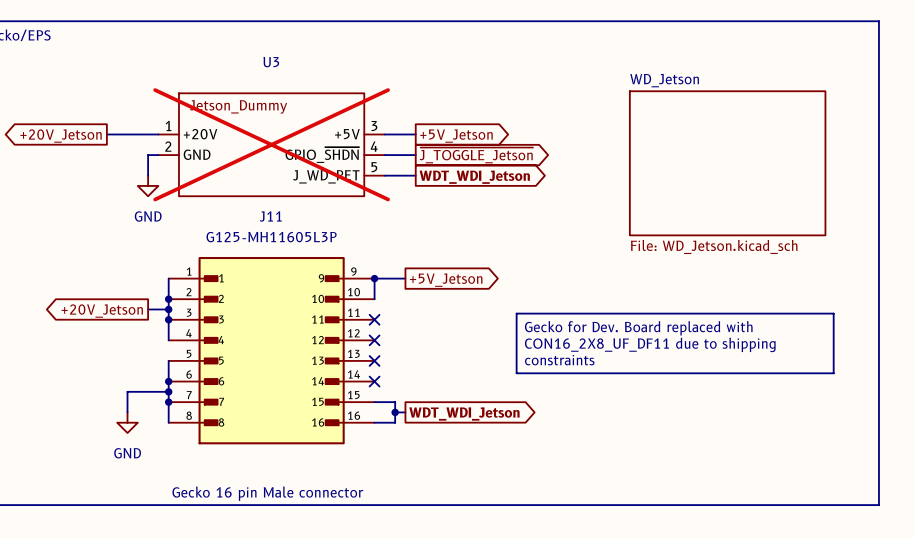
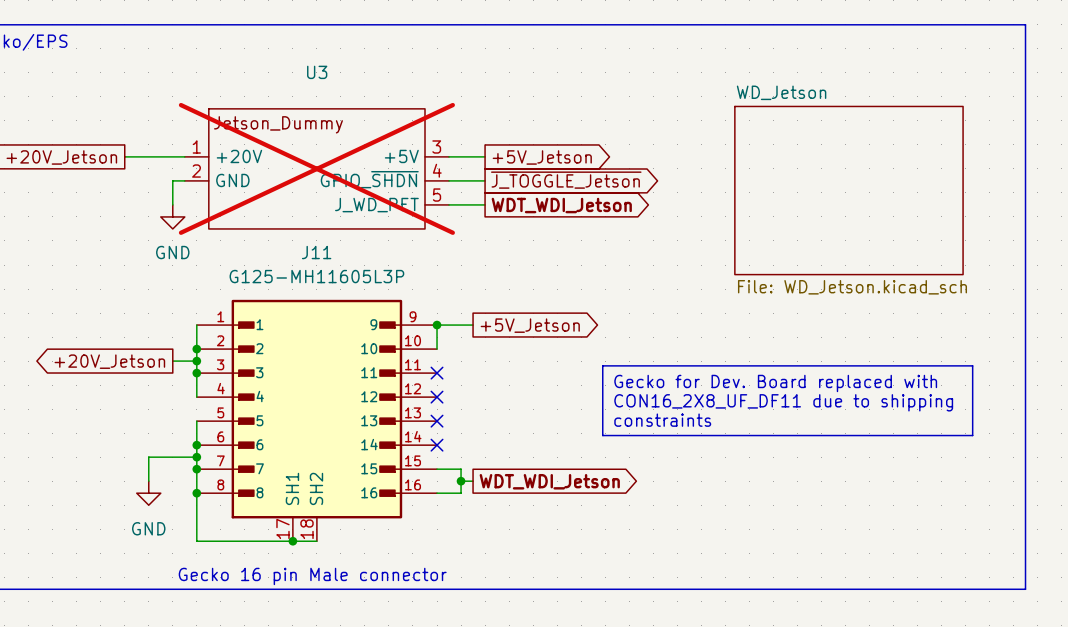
J11 symbol: [168, 256, 375, 445] -> [196, 299, 438, 542]
wire: none -> (196, 493) (196, 541) (316, 541)
junction: none -> (196, 493)
junction: none -> (292, 541)

